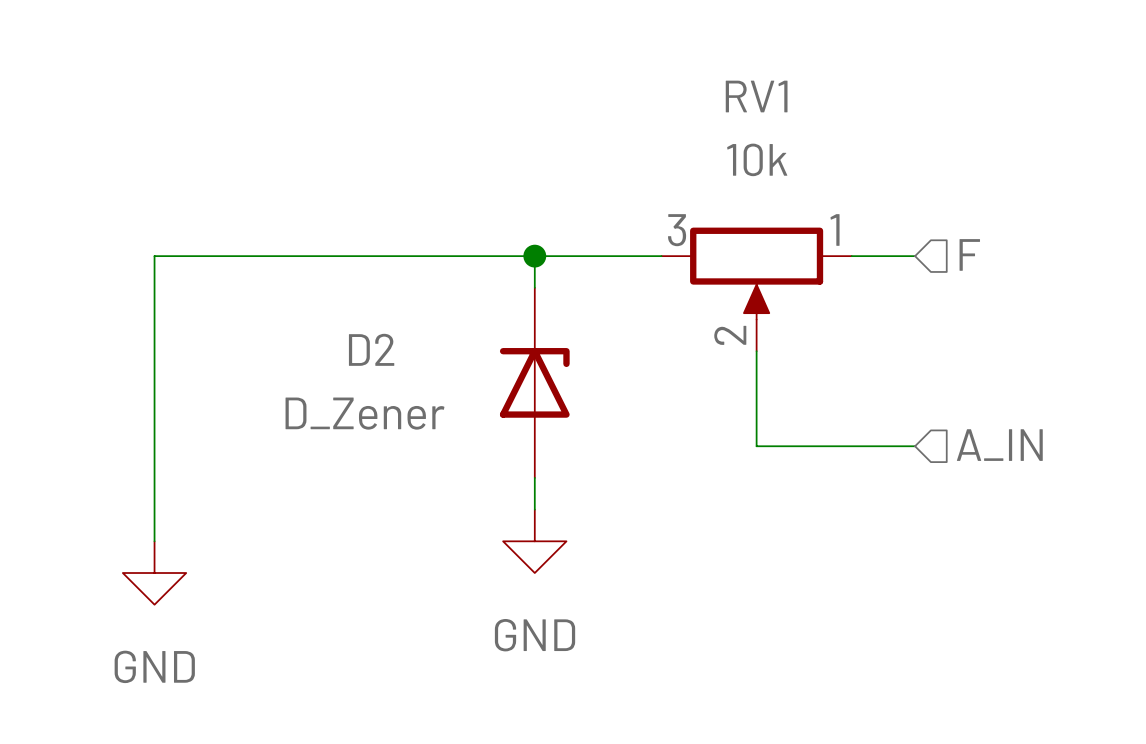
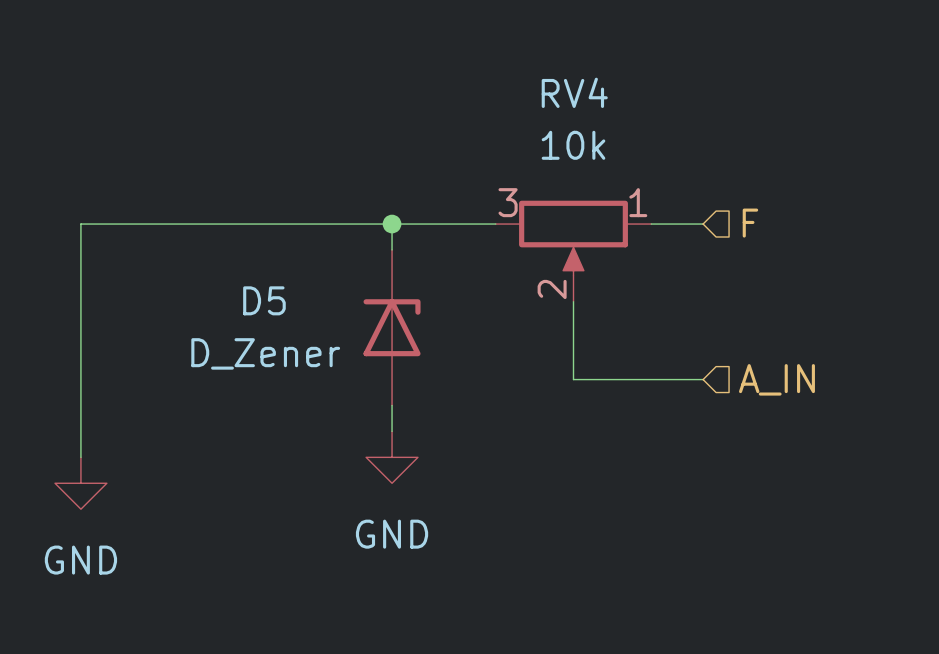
RV1 name: RV1 (756, 96) -> RV4 (574, 92)
D2 name: D2 (371, 349) -> D5 (264, 300)

